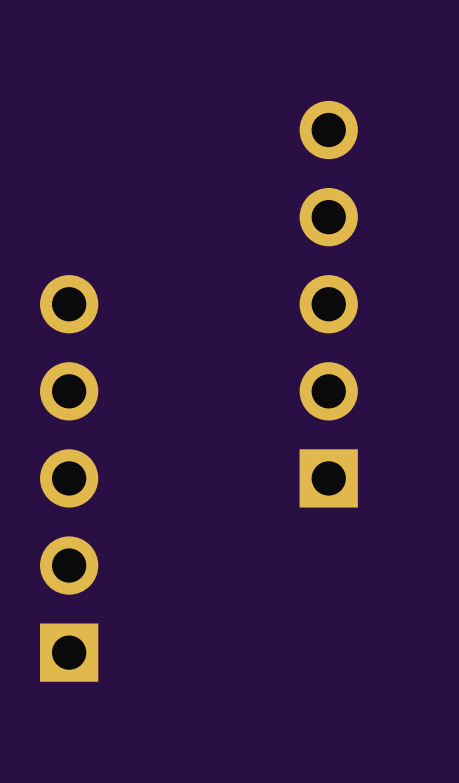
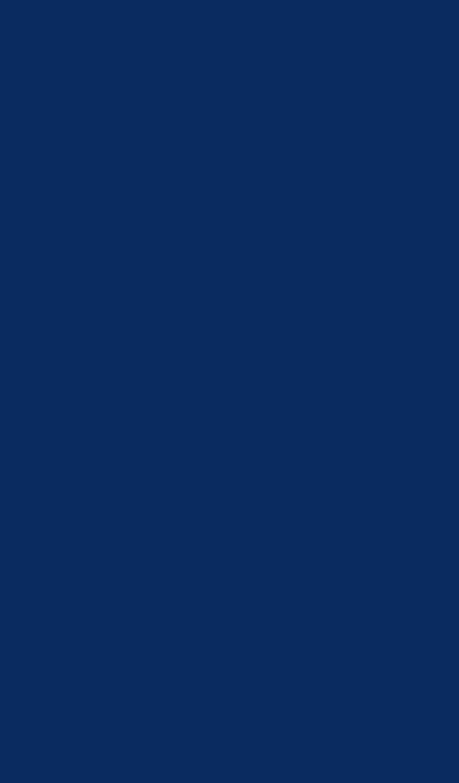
part: (328, 304) -> none
part: (69, 478) -> none

